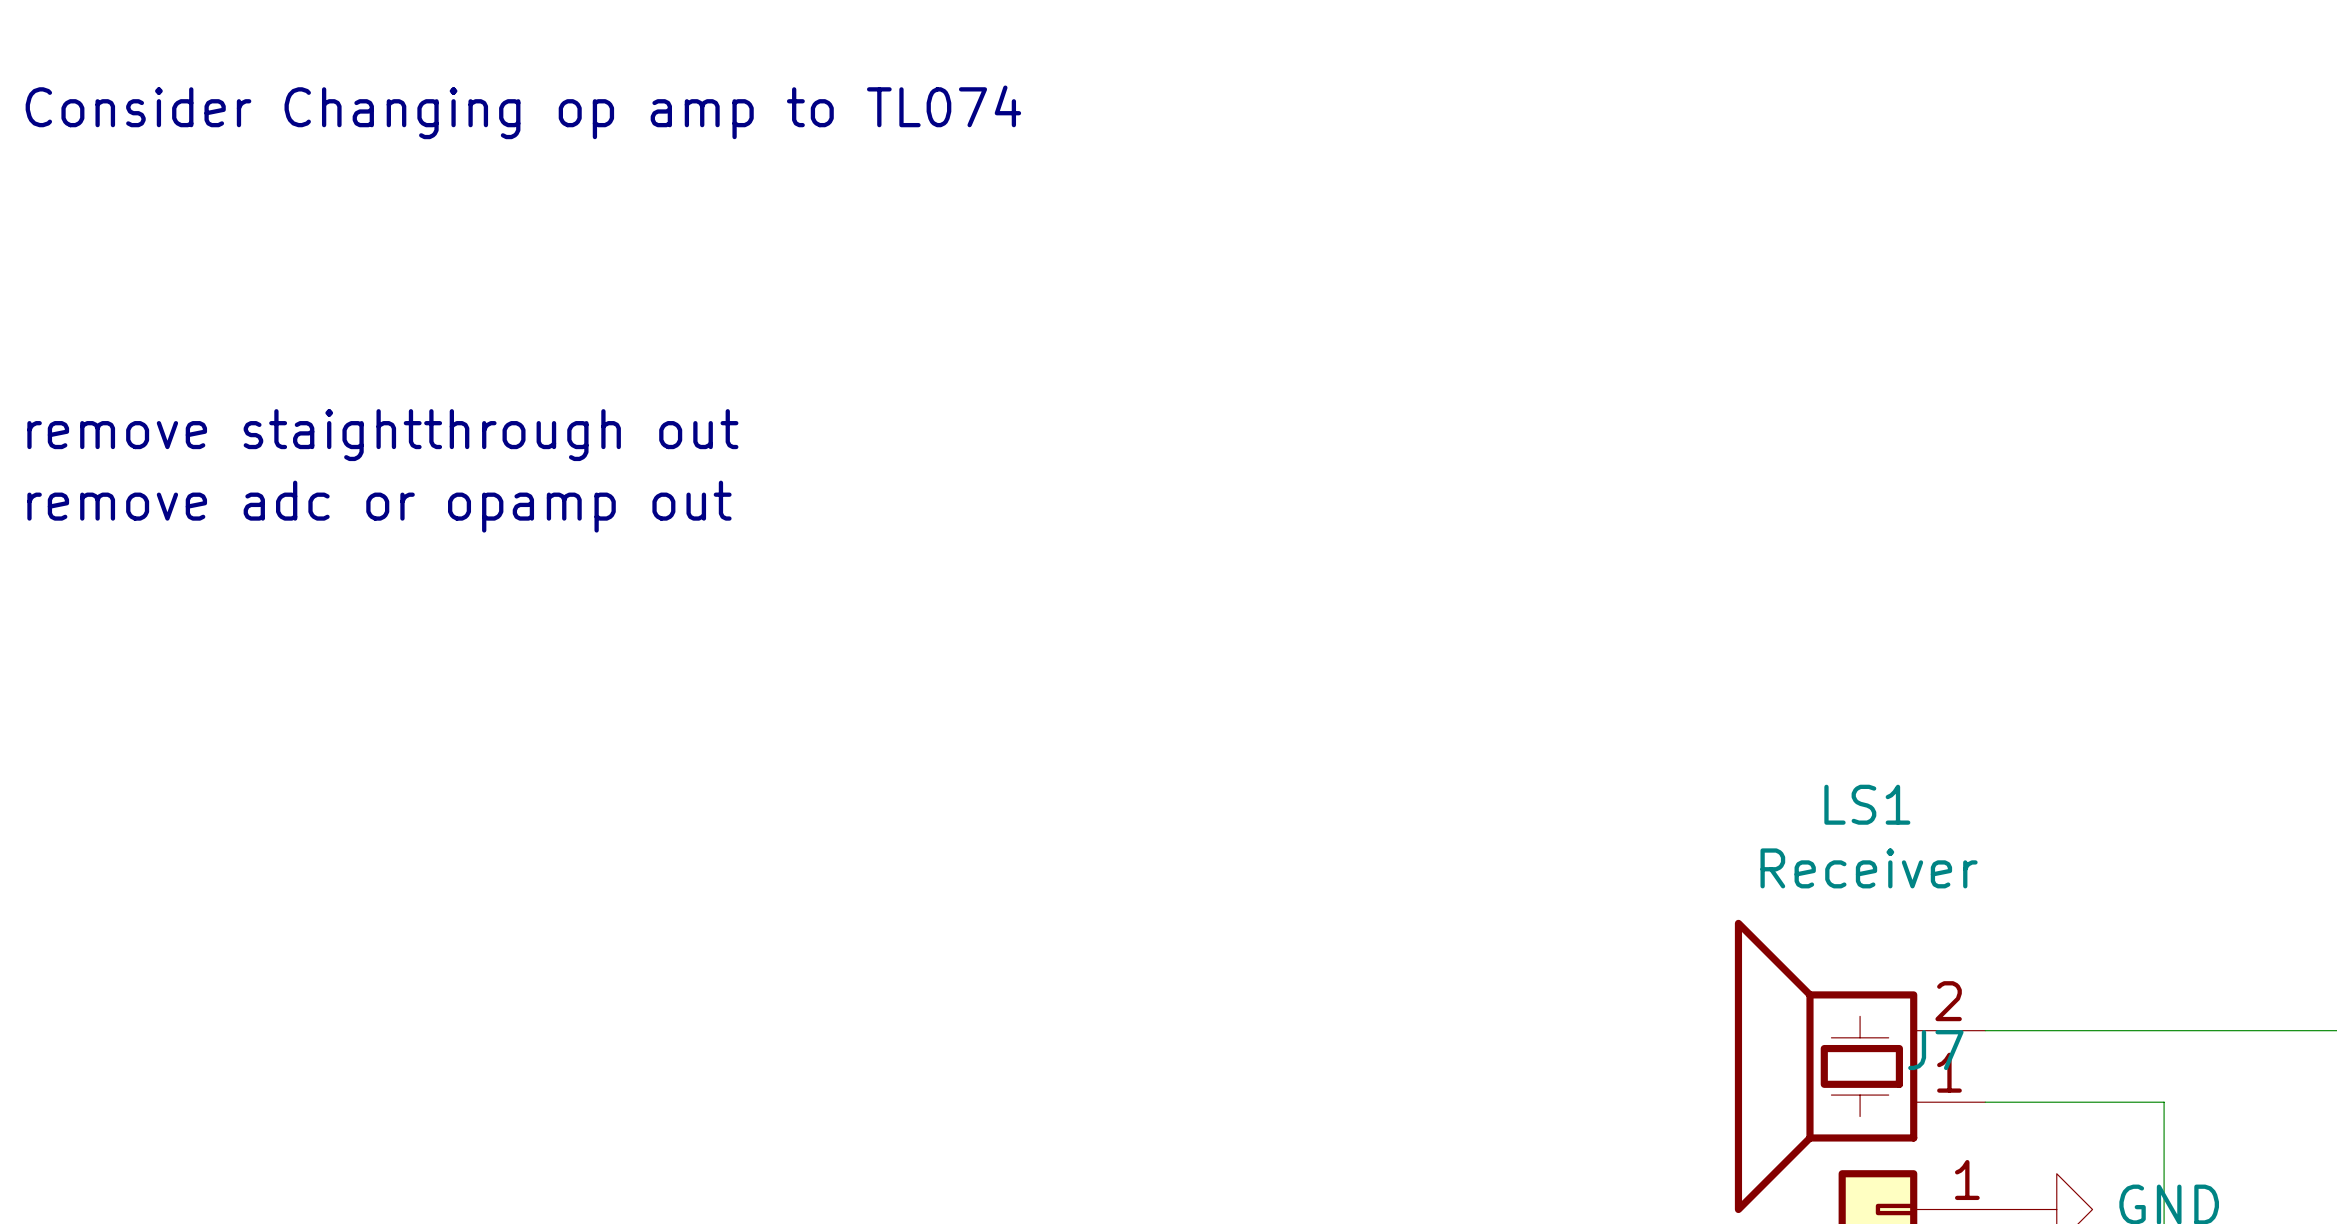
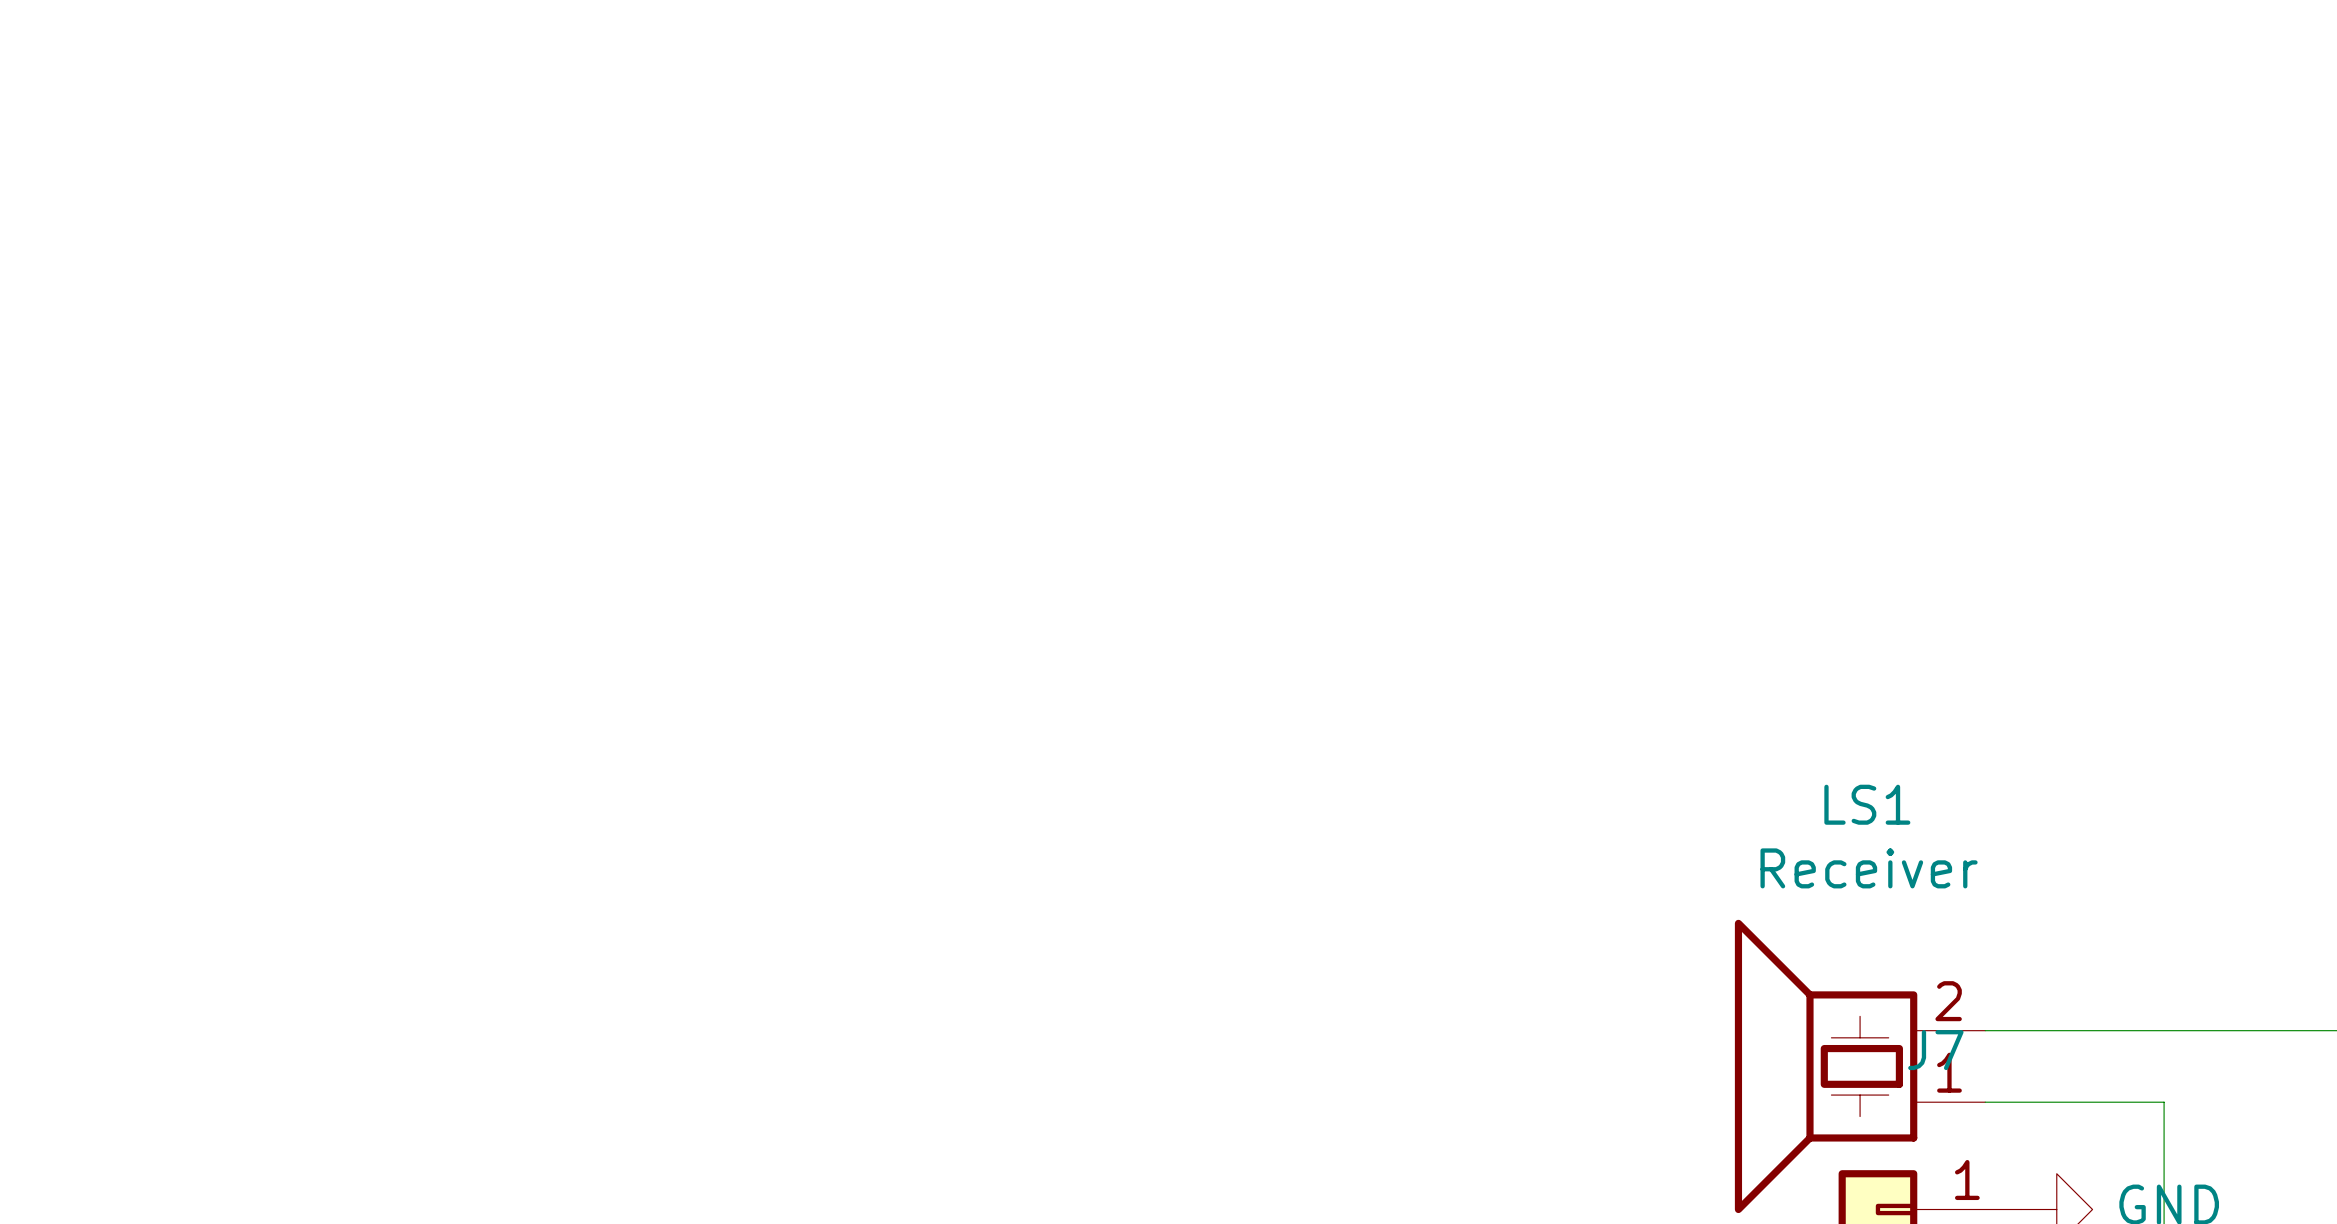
text: Consider Changing op amp to TL074 (523, 112) -> none
text: remove staightthrough out (382, 435) -> none
text: remove adc or opamp out (379, 506) -> none

